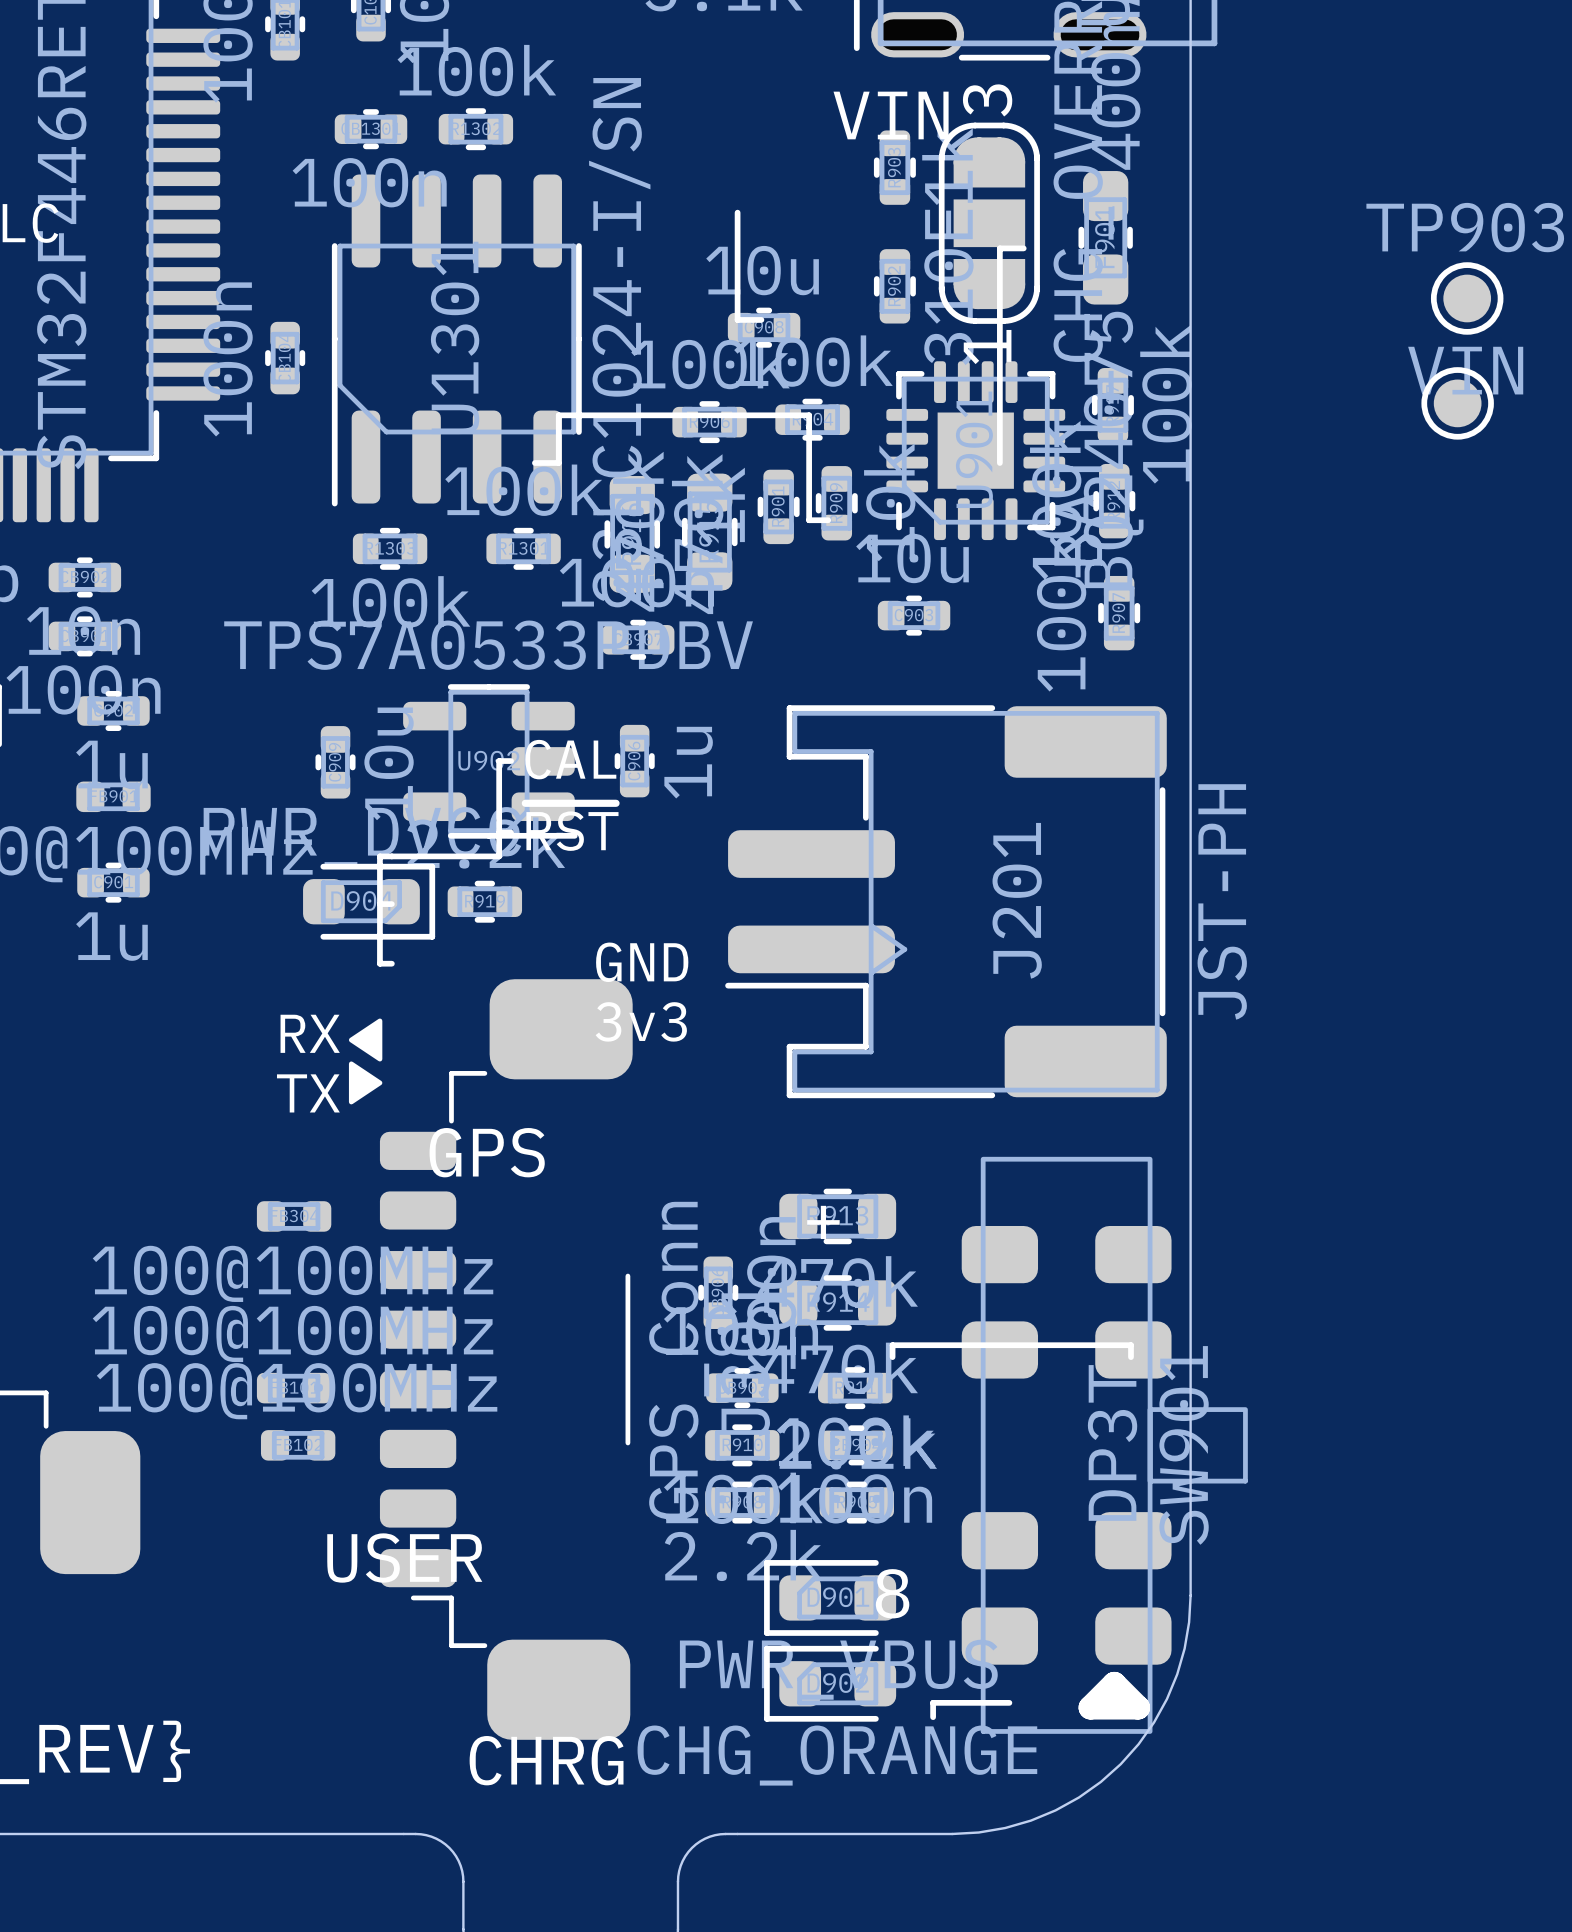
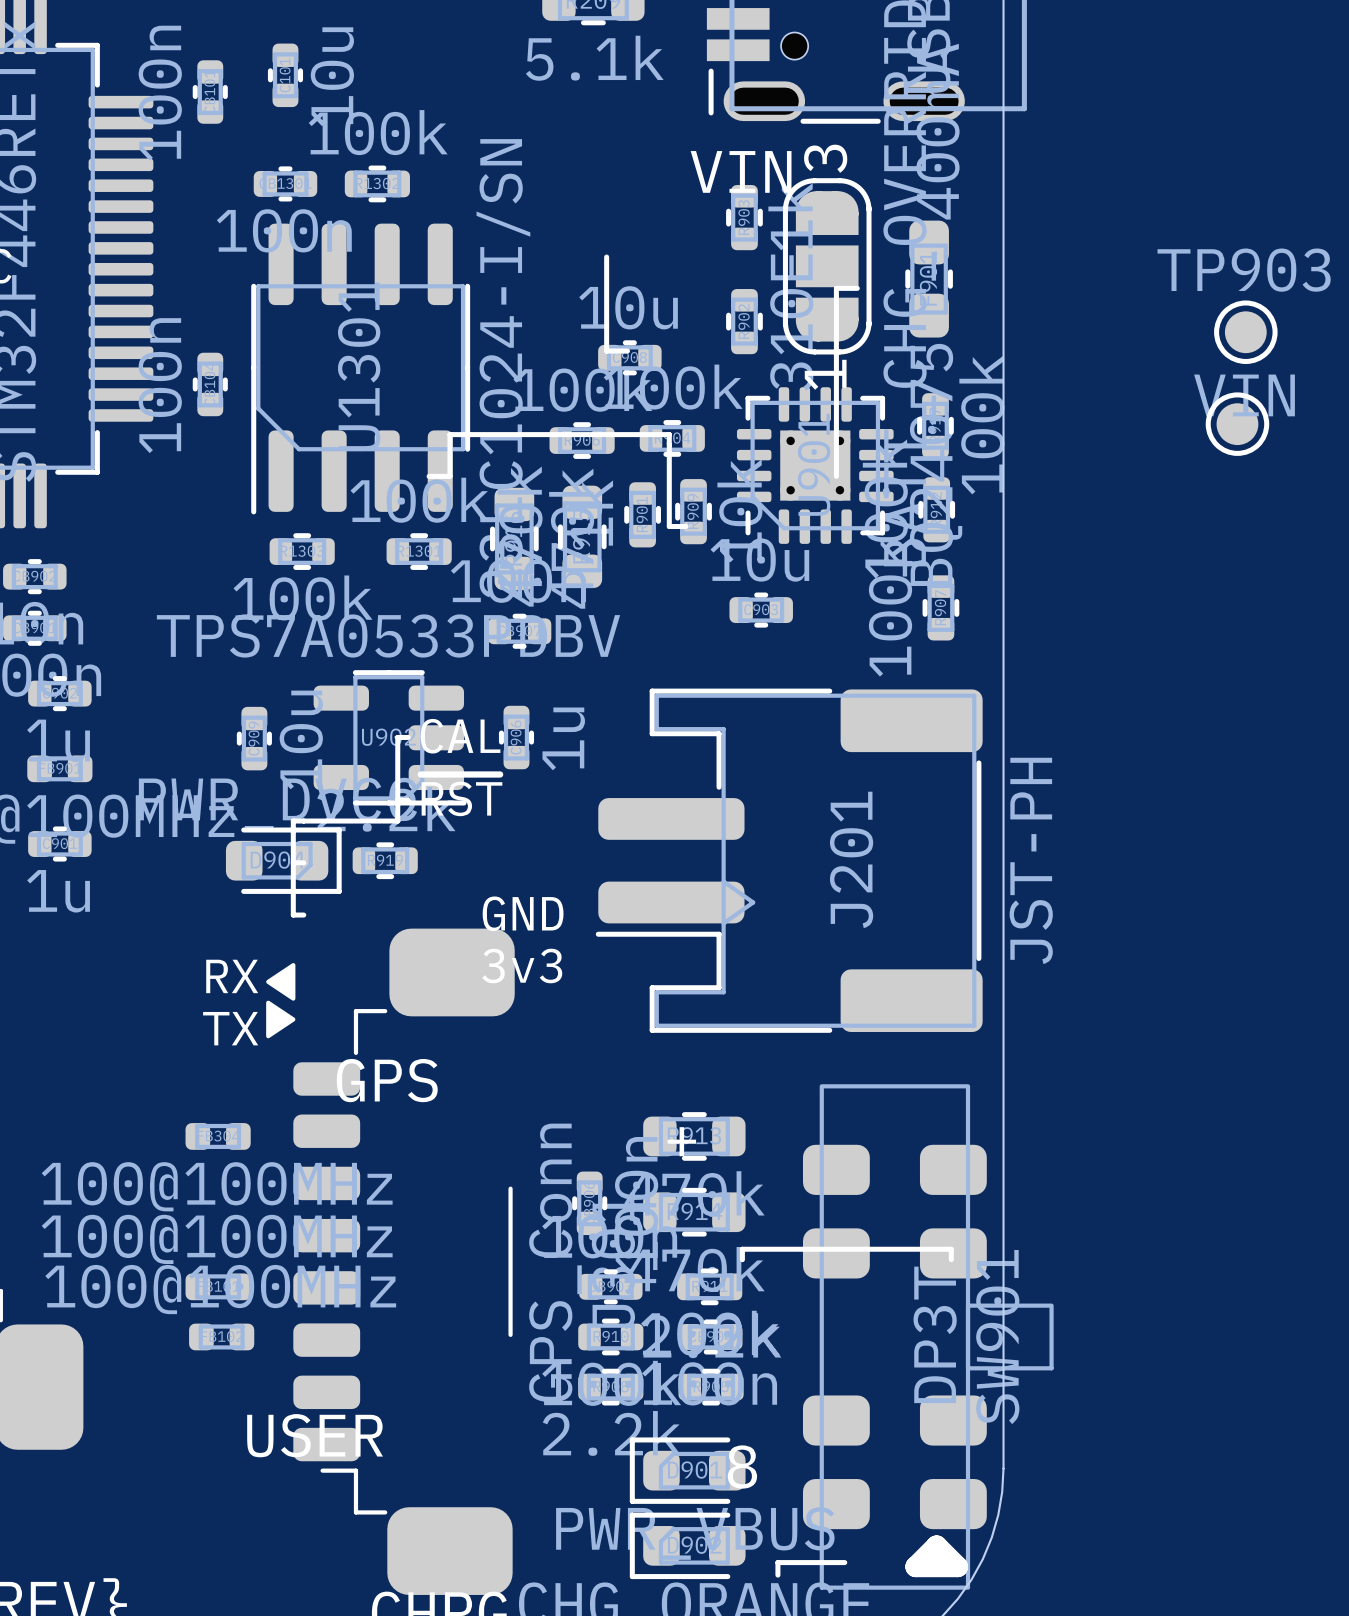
part footprint: [886, 361, 1066, 541] -> [736, 387, 894, 544]

